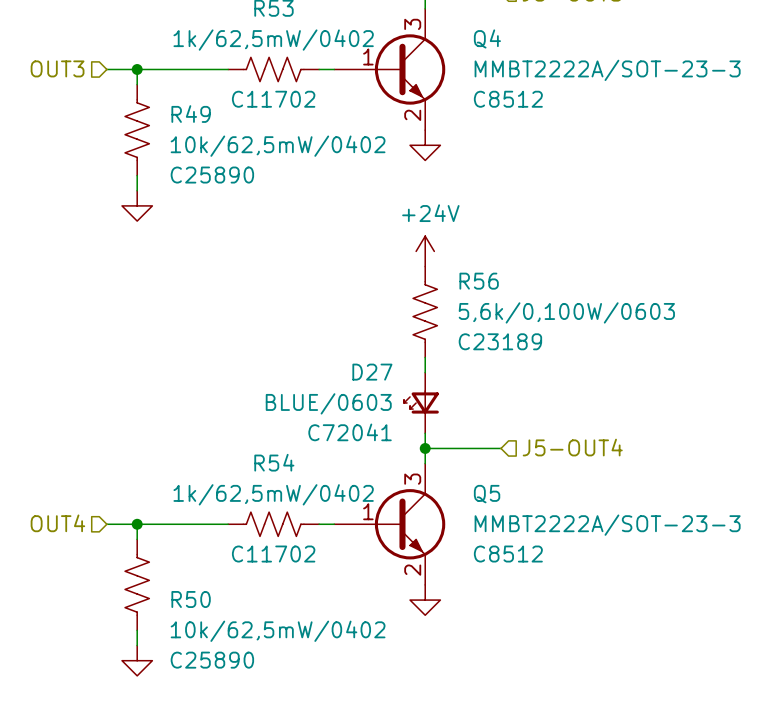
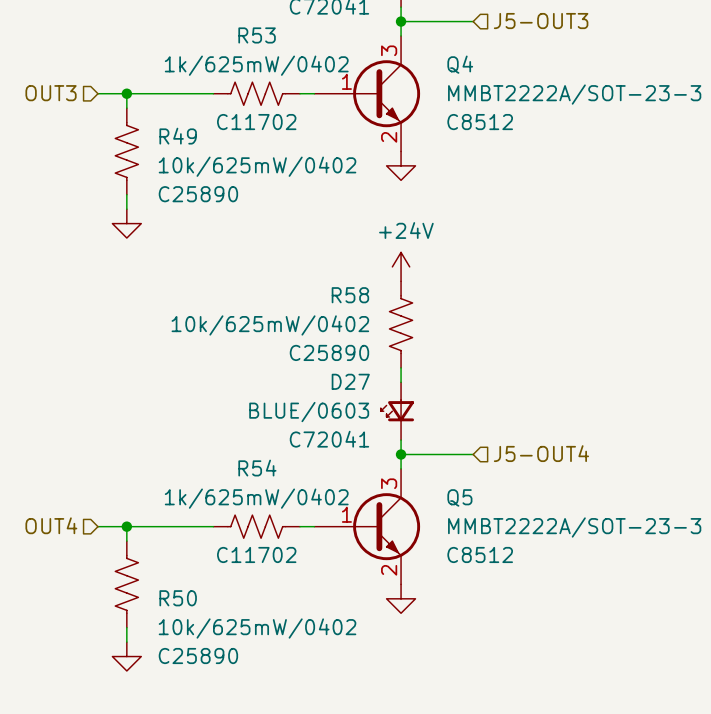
R53 value: 1k/62,5mW/0402 (273, 40) -> 1k/625mW/0402 (256, 65)
R49 value: 10k/62,5mW/0402 (278, 146) -> 10k/625mW/0402 (257, 166)
R56 name: R56 (479, 281) -> R58 (350, 295)
R56 value: 5,6k/0,100W/0603 (566, 312) -> 10k/625mW/0402 (270, 325)
R56 text: C23189 (500, 341) -> C25890 (329, 352)
R54 value: 1k/62,5mW/0402 (273, 494) -> 1k/625mW/0402 (256, 498)
R50 value: 10k/62,5mW/0402 (278, 631) -> 10k/625mW/0402 (257, 628)

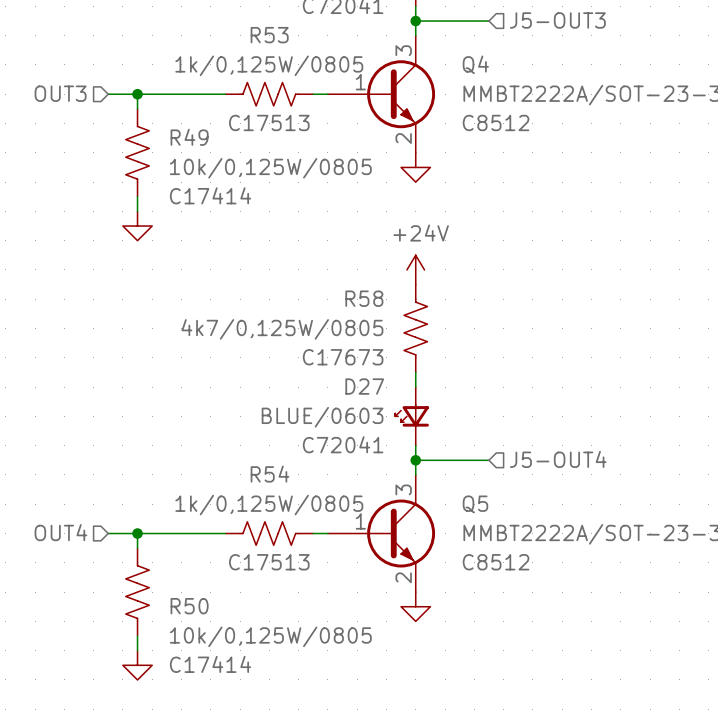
R53 value: 1k/625mW/0402 (256, 65) -> 1k/0,125W/0805 (269, 65)
R53 text: C11702 (256, 122) -> C17513 (269, 122)
R49 value: 10k/625mW/0402 (257, 166) -> 10k/0,125W/0805 (270, 168)
R49 text: C25890 (198, 194) -> C17414 (210, 195)
R58 value: 10k/625mW/0402 (270, 325) -> 4k7/0,125W/0805 (282, 329)
R58 text: C25890 (329, 352) -> C17673 (343, 357)
R54 value: 1k/625mW/0402 (256, 498) -> 1k/0,125W/0805 (269, 505)
R54 text: C11702 (256, 554) -> C17513 (269, 562)
R50 value: 10k/625mW/0402 (257, 628) -> 10k/0,125W/0805 (270, 636)
R50 text: C25890 (198, 656) -> C17414 (210, 664)

